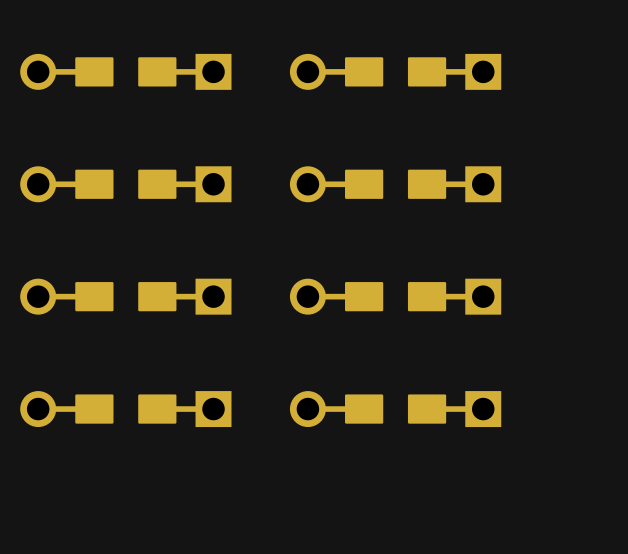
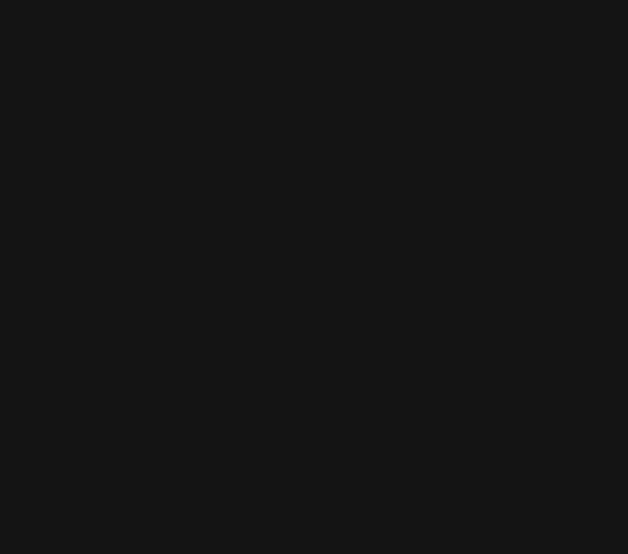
part: (125, 71) -> none
part: (395, 71) -> none
part: (125, 184) -> none
part: (395, 184) -> none
part: (125, 296) -> none
part: (395, 296) -> none
part: (125, 409) -> none
part: (395, 409) -> none

